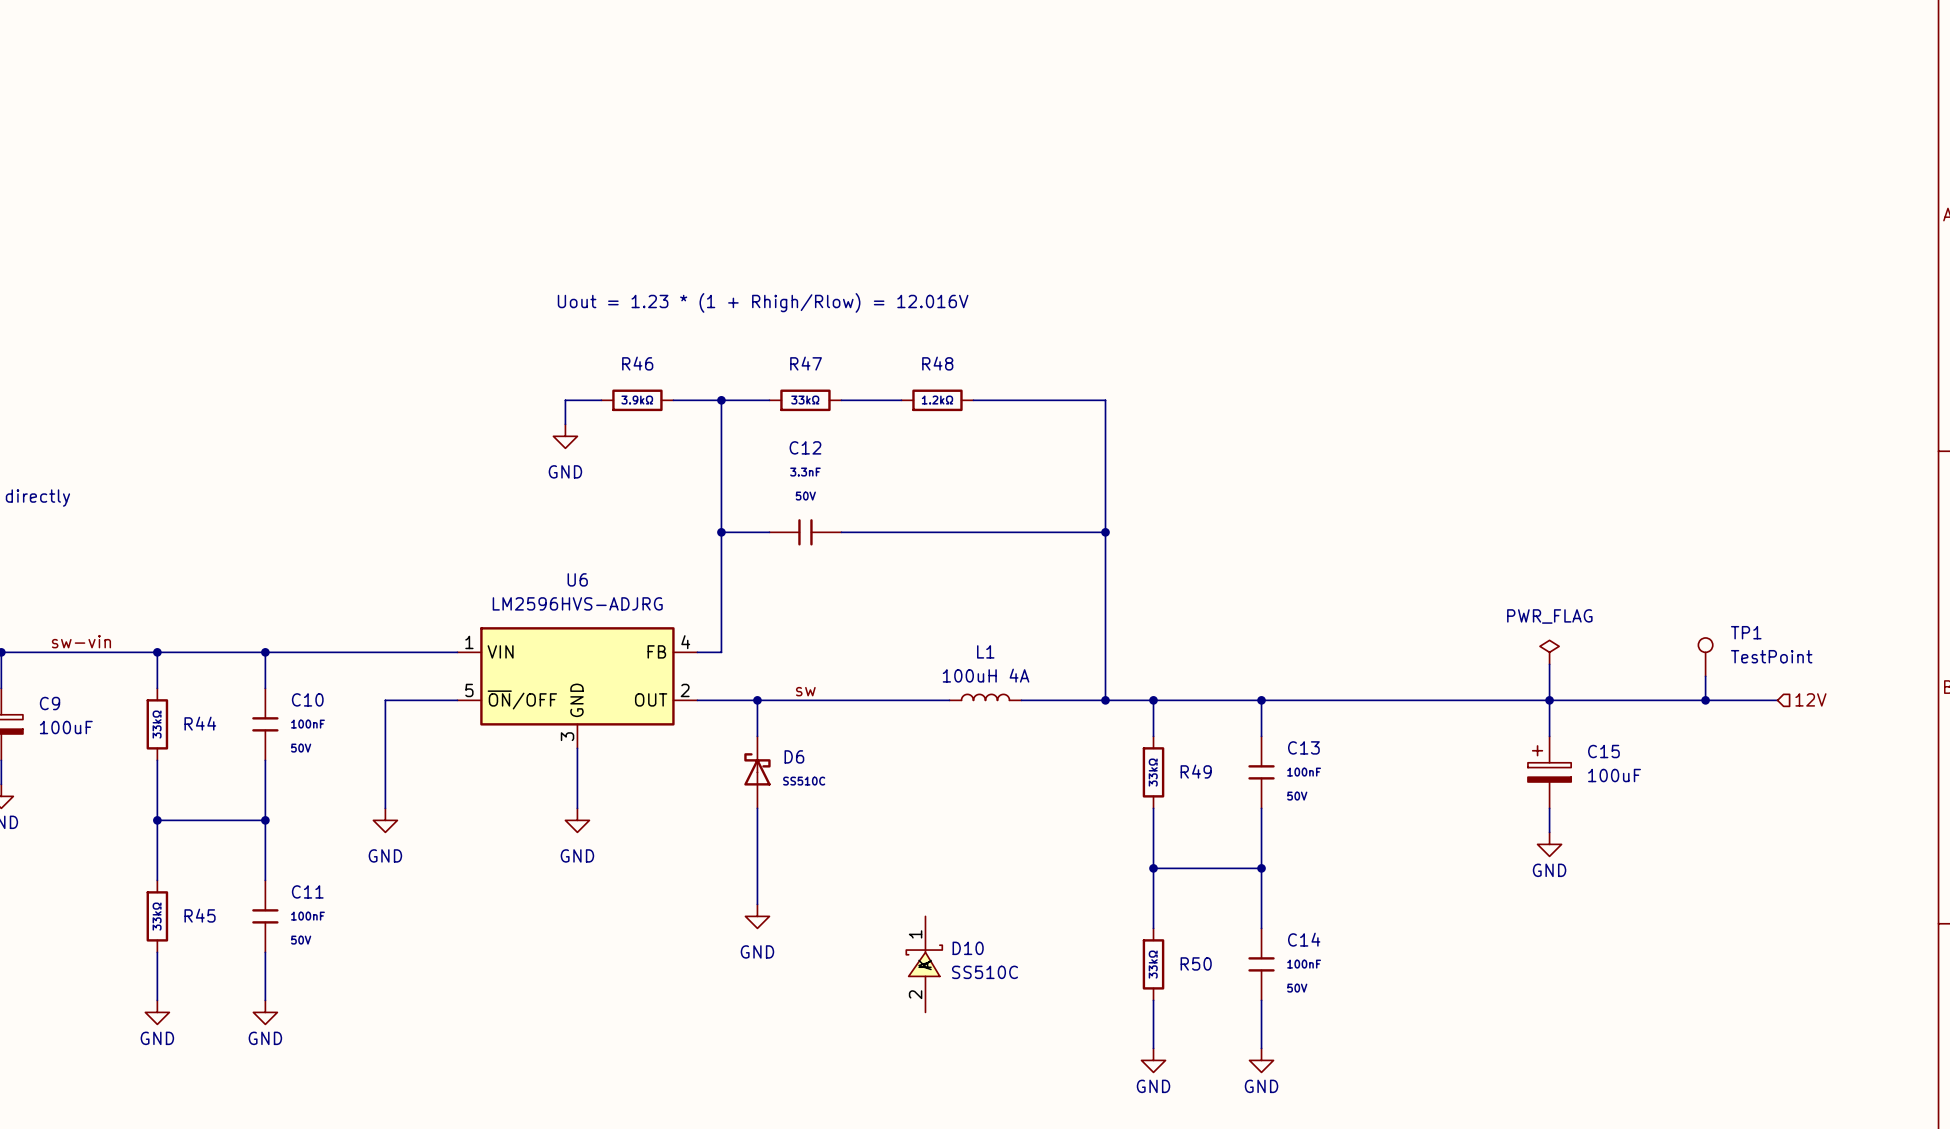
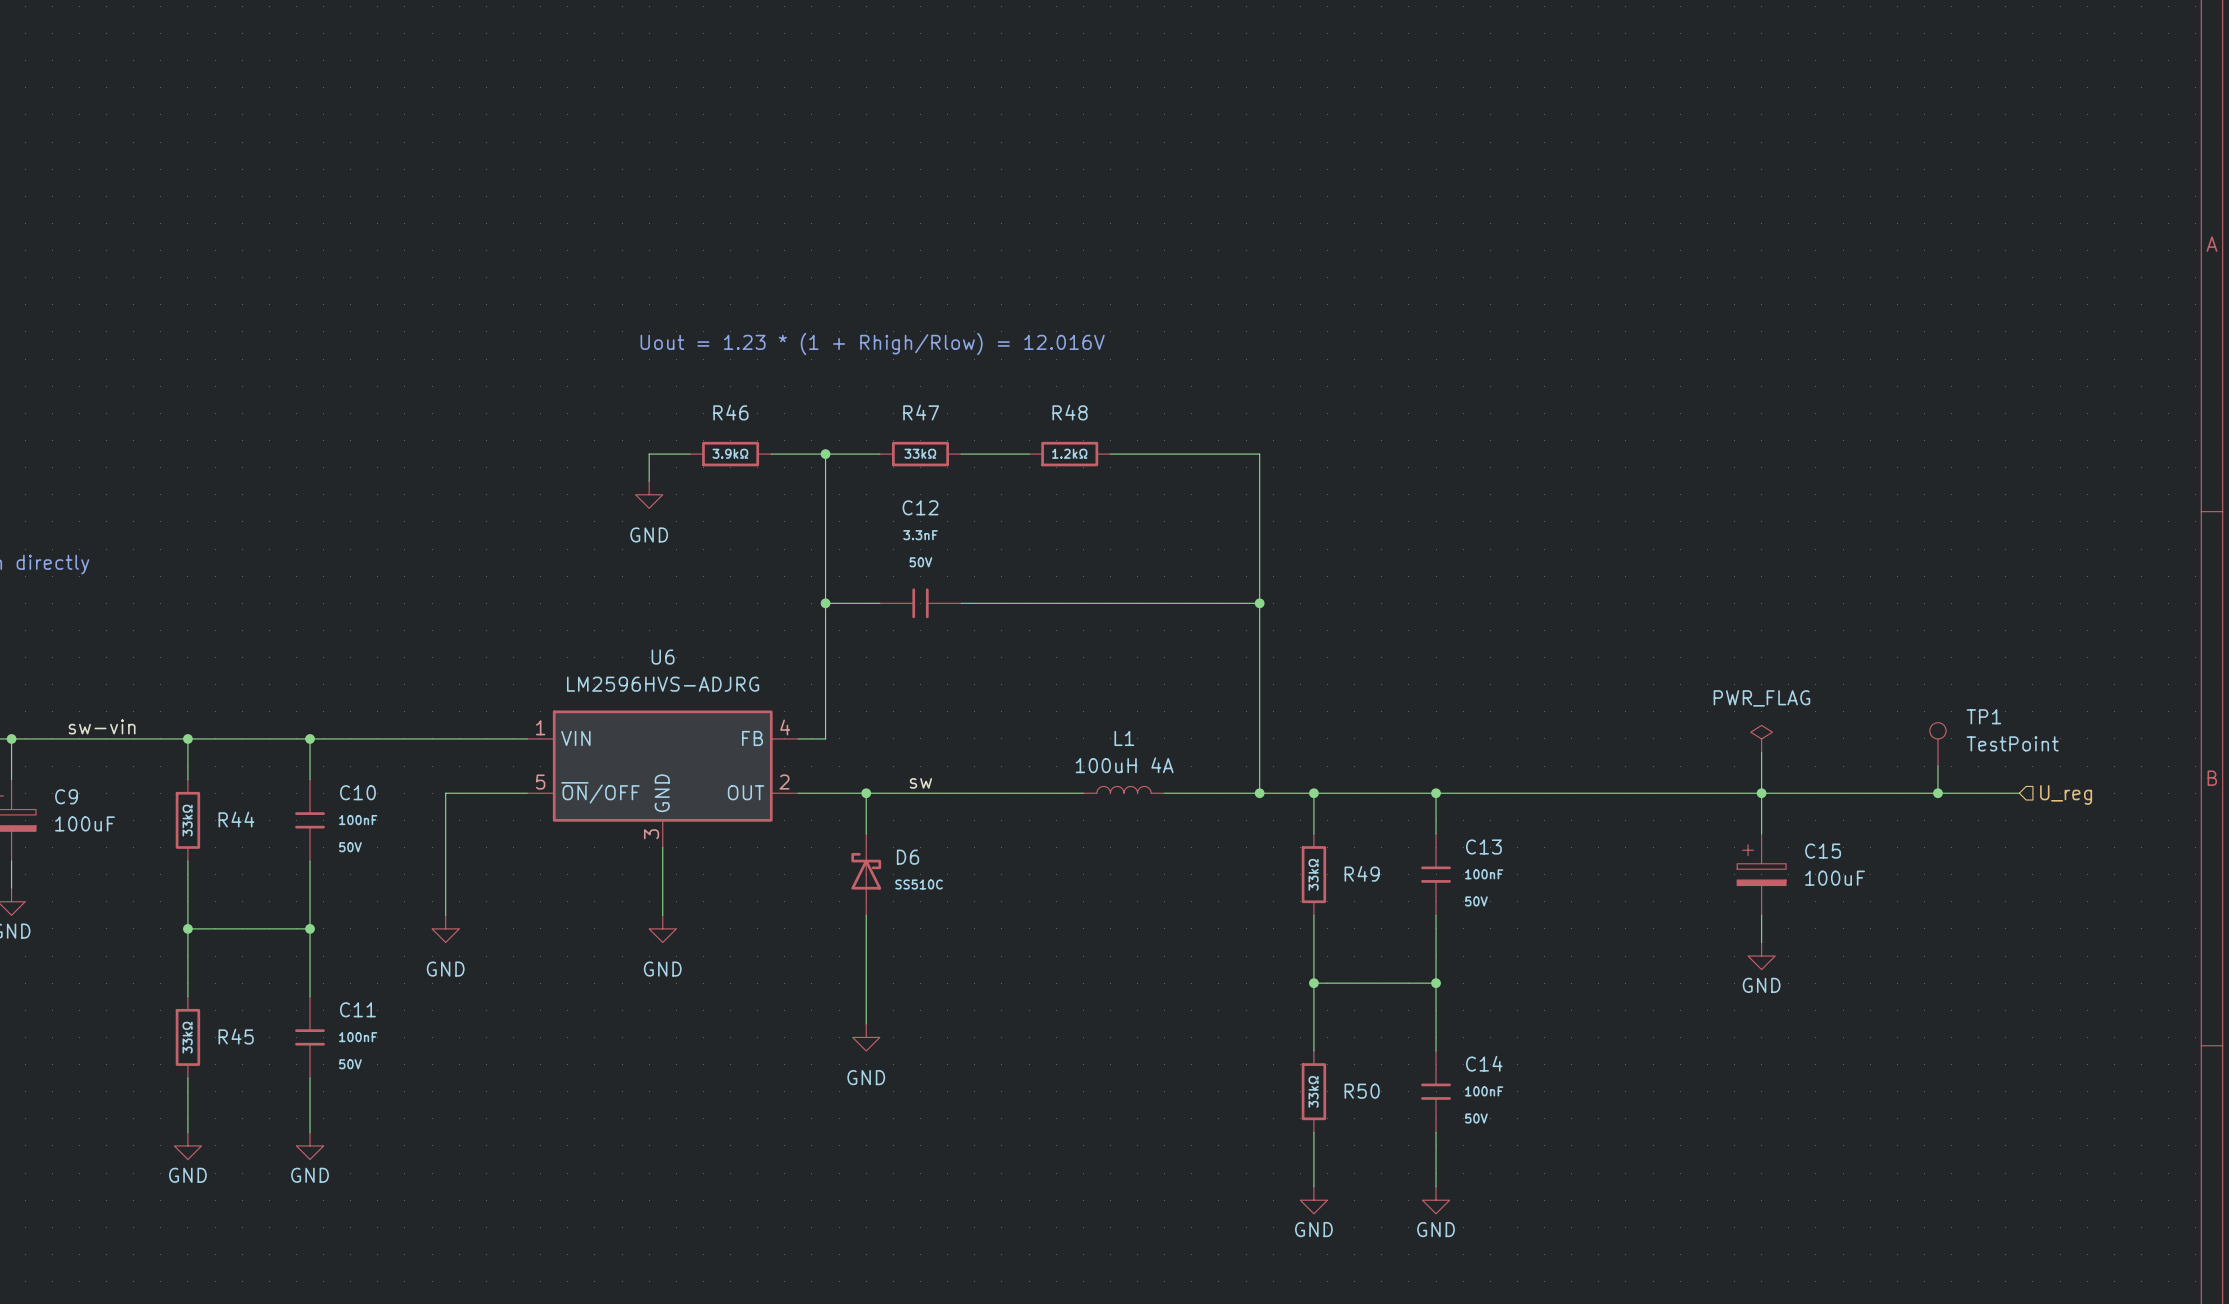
hierarchical label: 12V (1810, 699) -> U_reg (2066, 794)
D10: SS510C (924, 964) -> none

